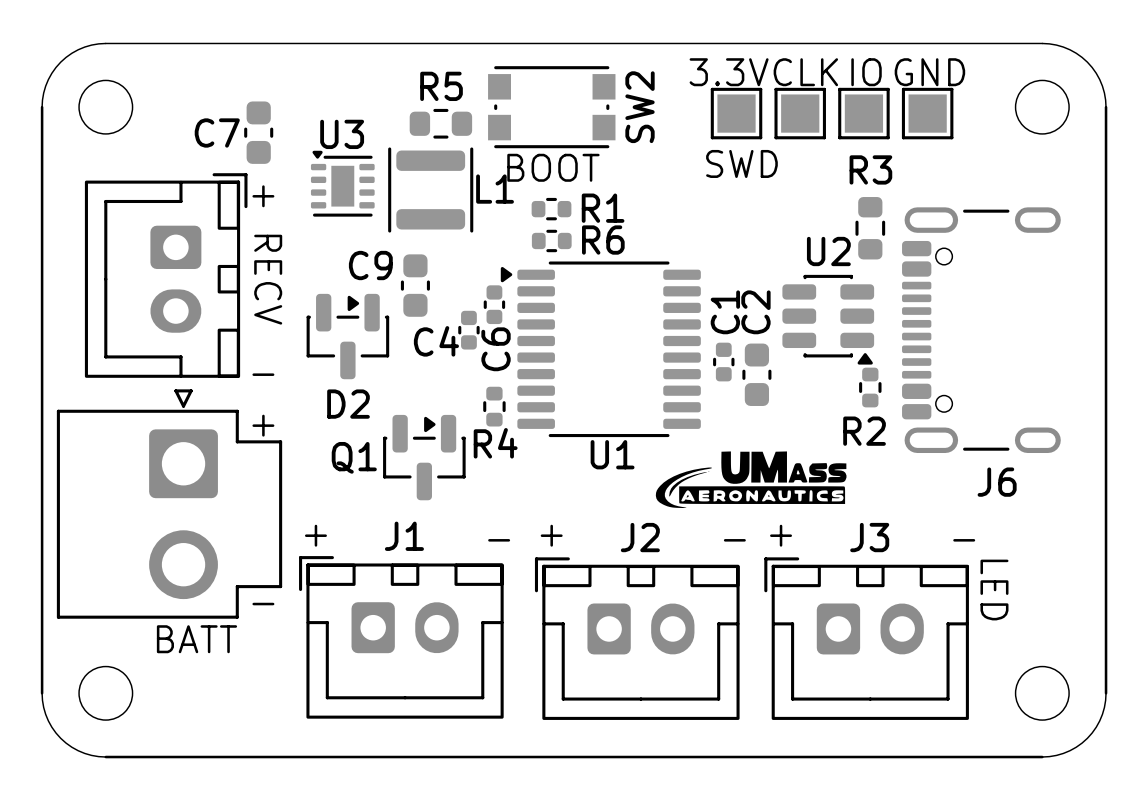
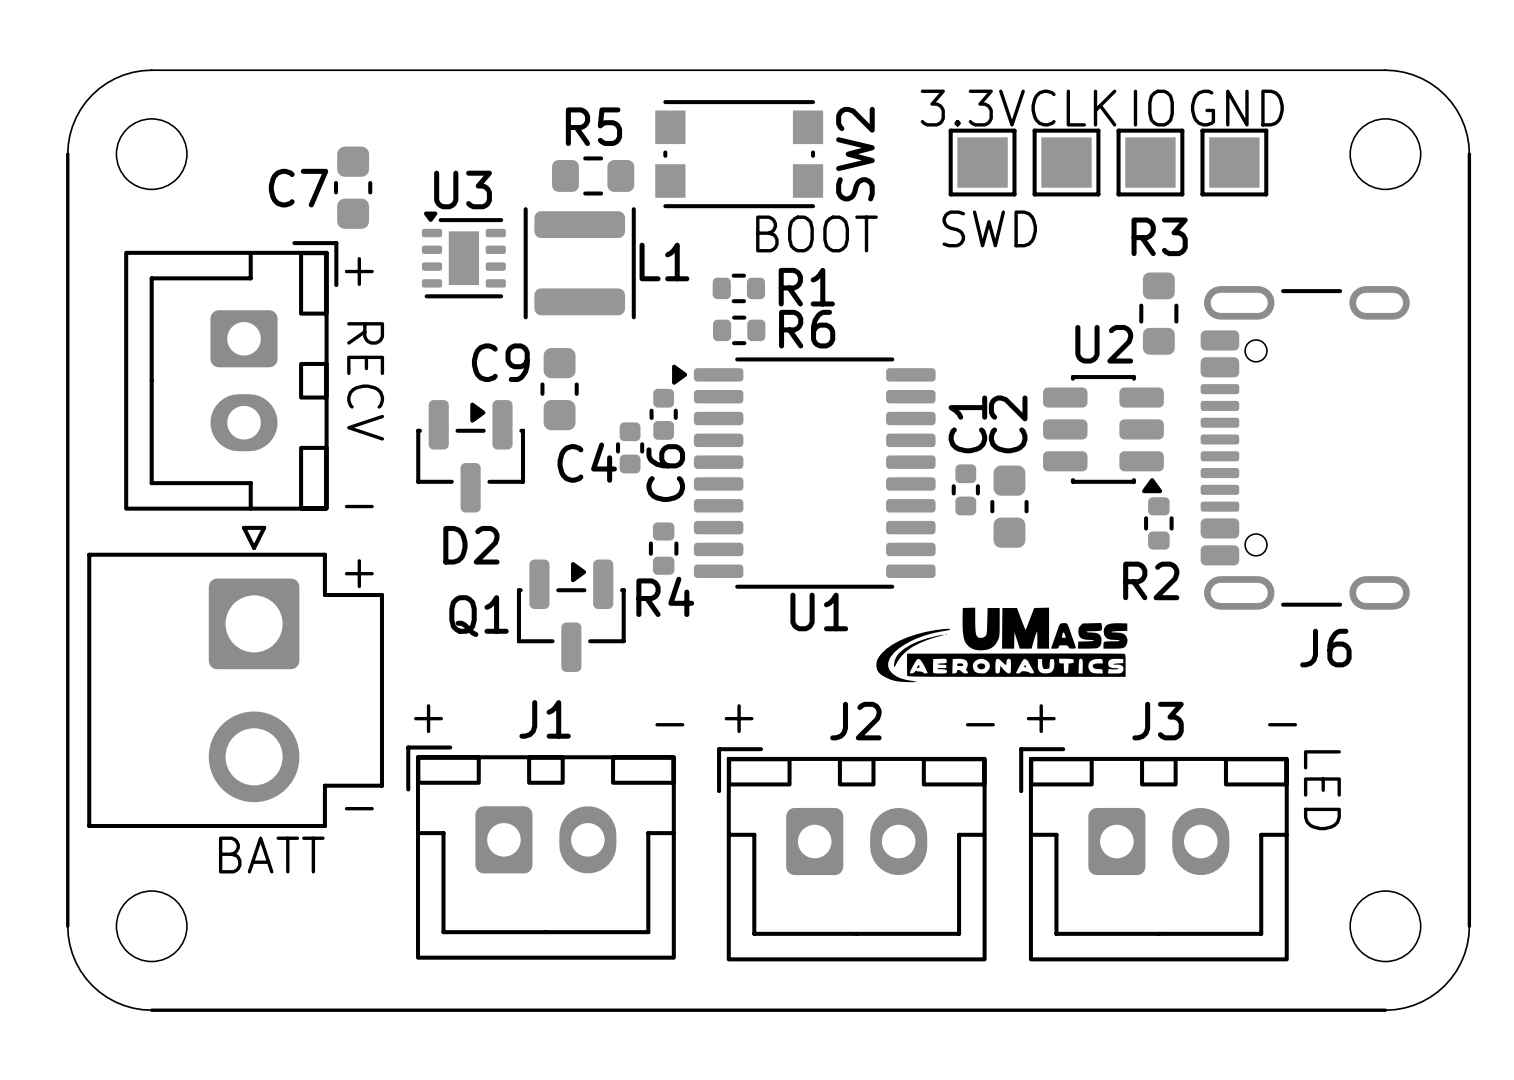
text position: BOOT (553, 167) -> BOOT (816, 233)

